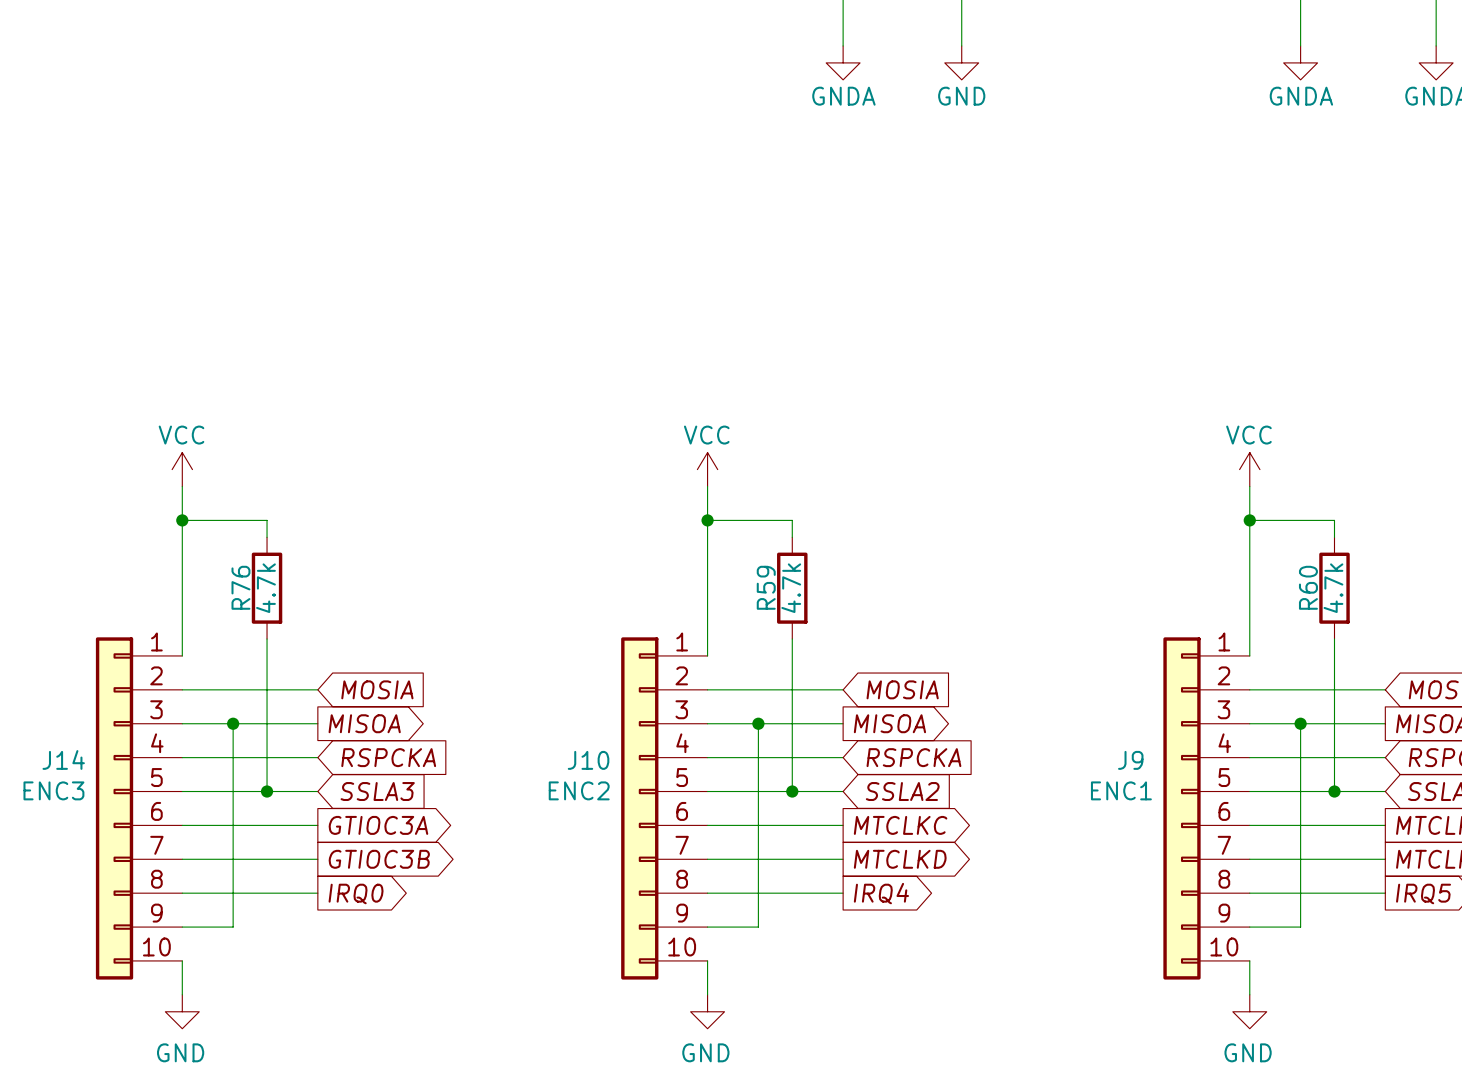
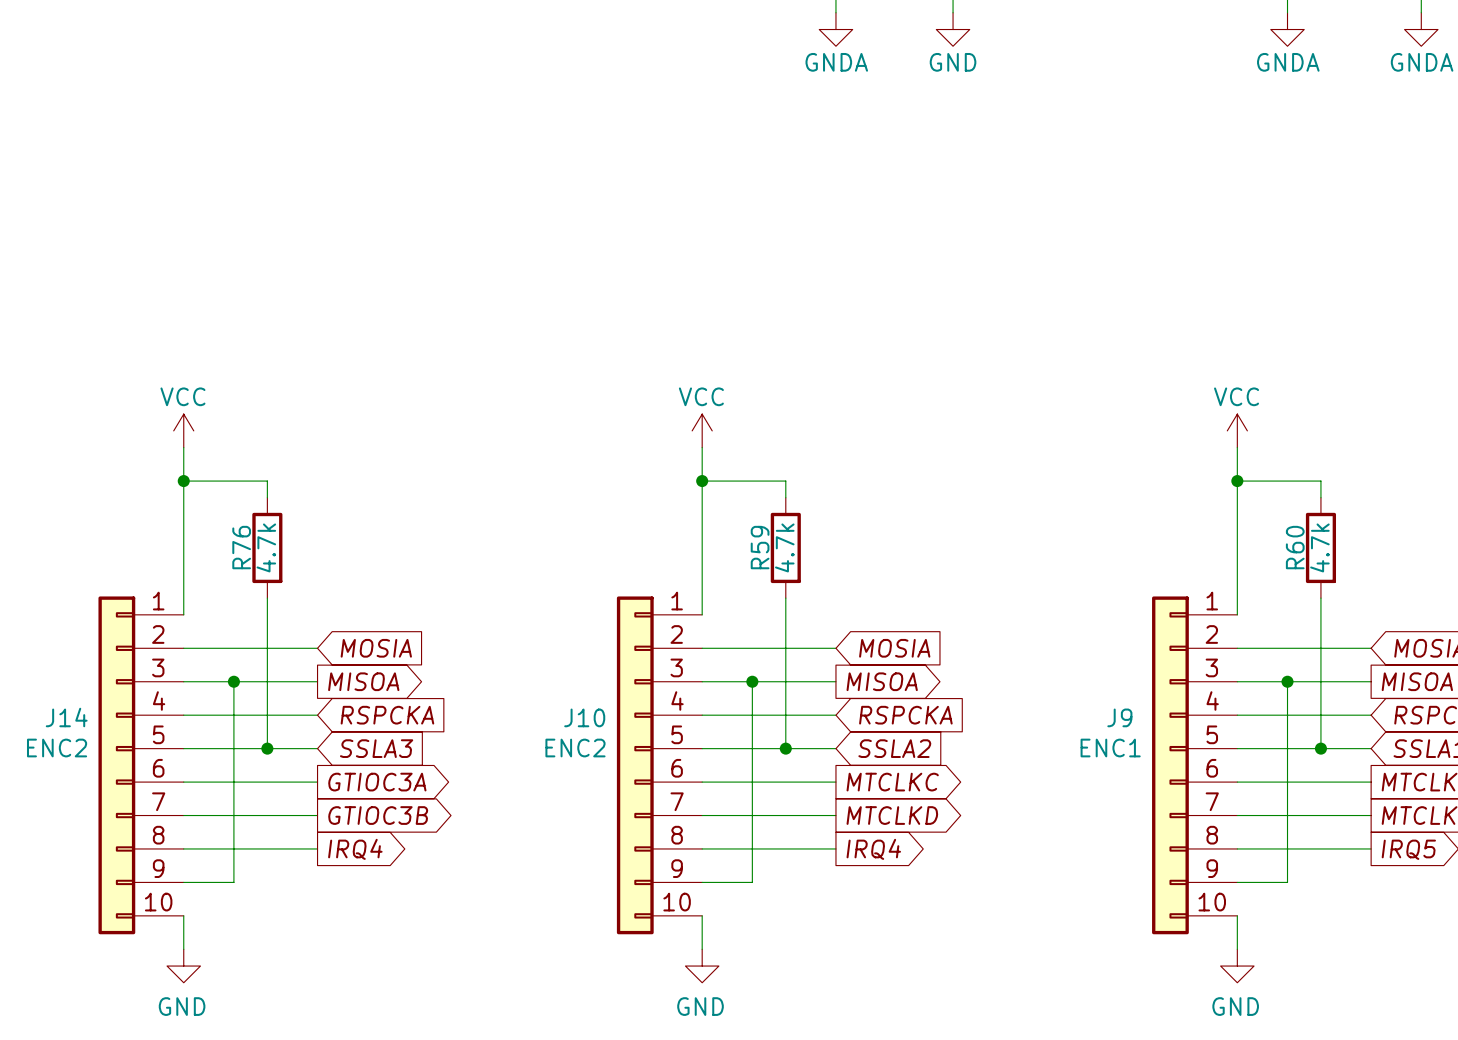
J14 value: ENC3 (53, 790) -> ENC2 (57, 748)
global label: IRQ0 (356, 893) -> IRQ4 (355, 849)

